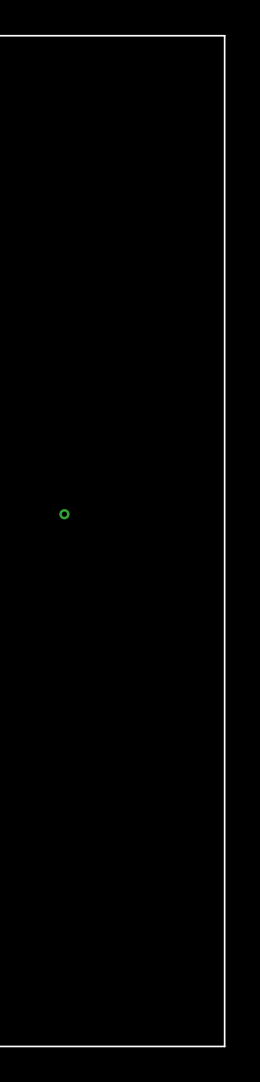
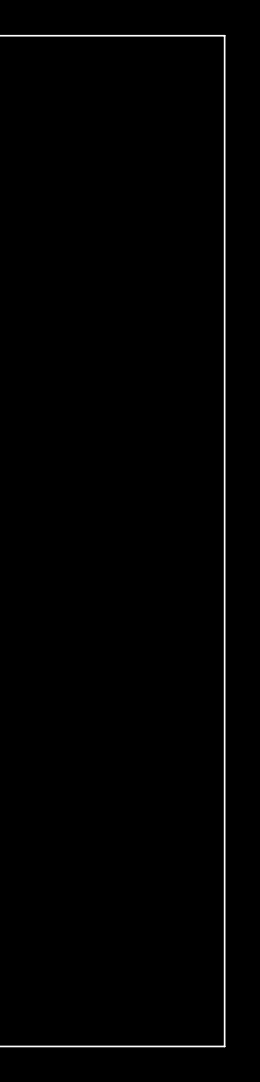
via: (64, 514) -> none

